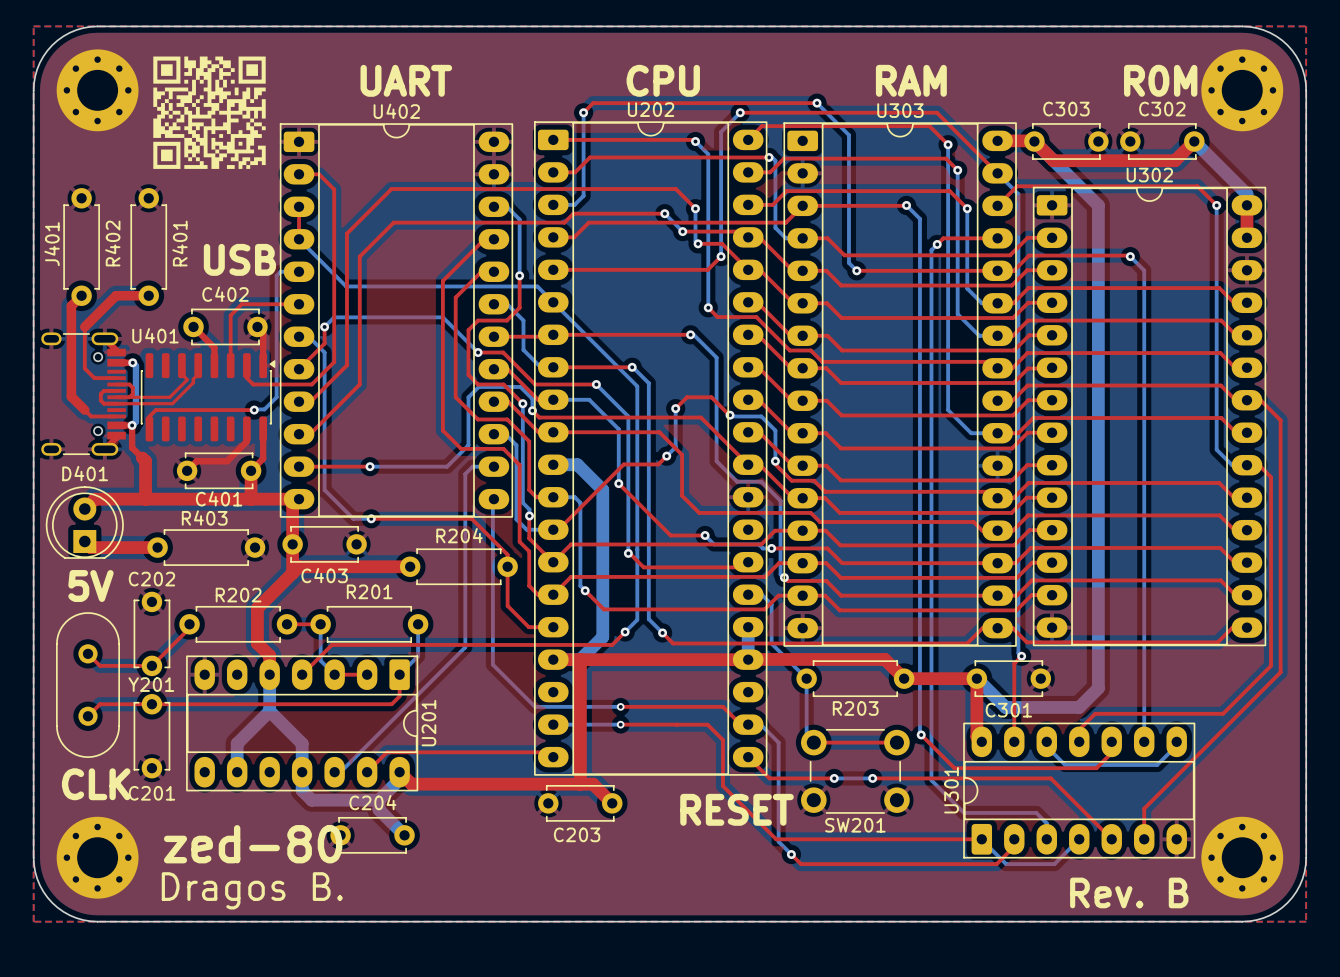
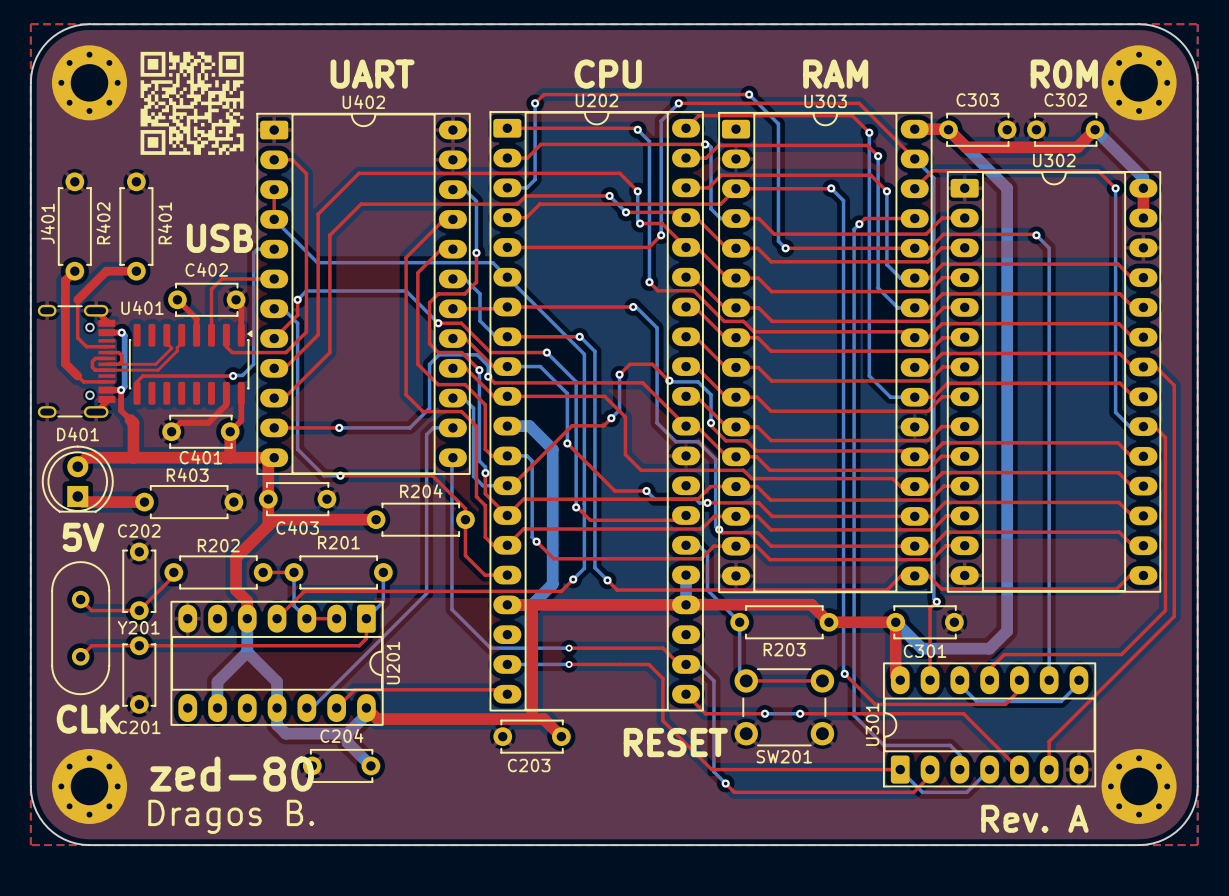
text: Rev. B (1129, 892) -> Rev. A (1034, 818)

